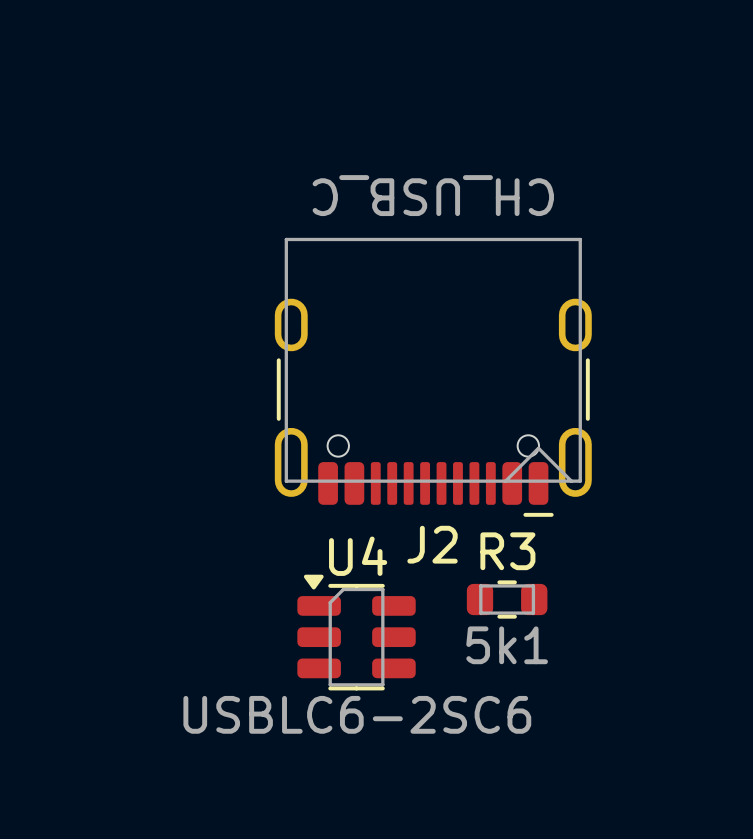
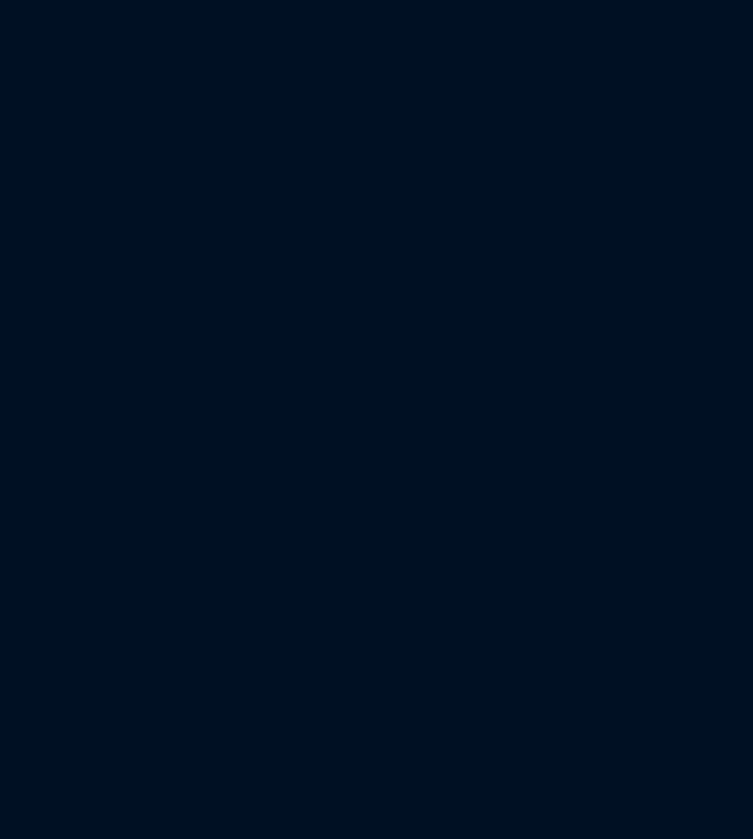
J2: CH_USB_C (433, 377) -> none
R3: 5k1 (507, 599) -> none
U4: USBLC6-2SC6 (356, 632) -> none

